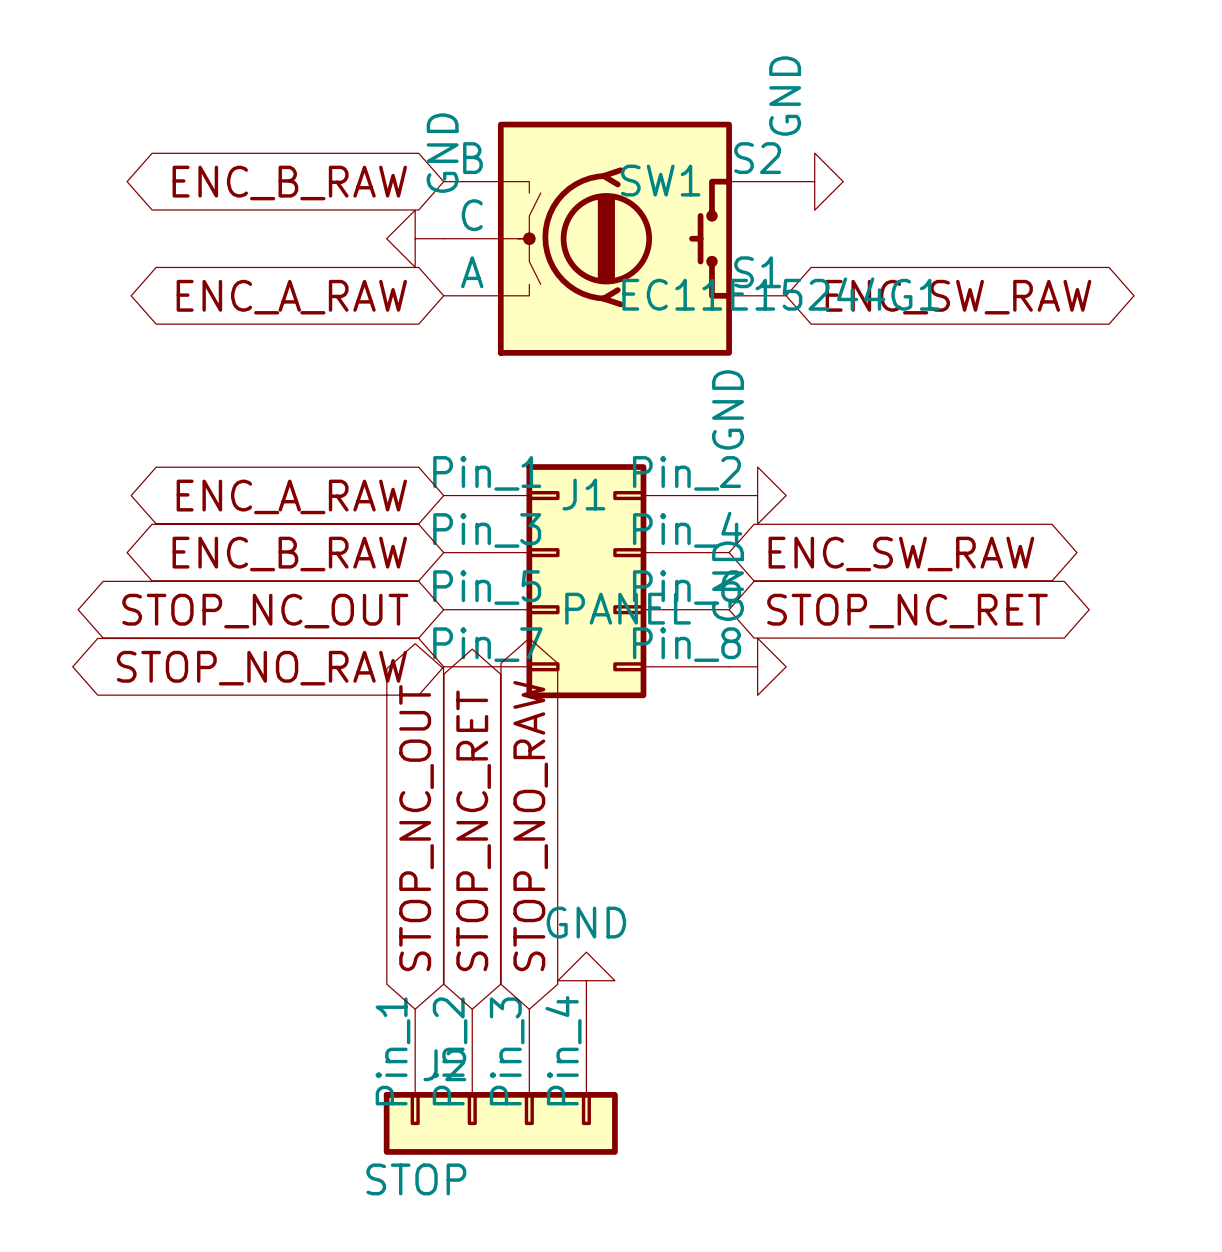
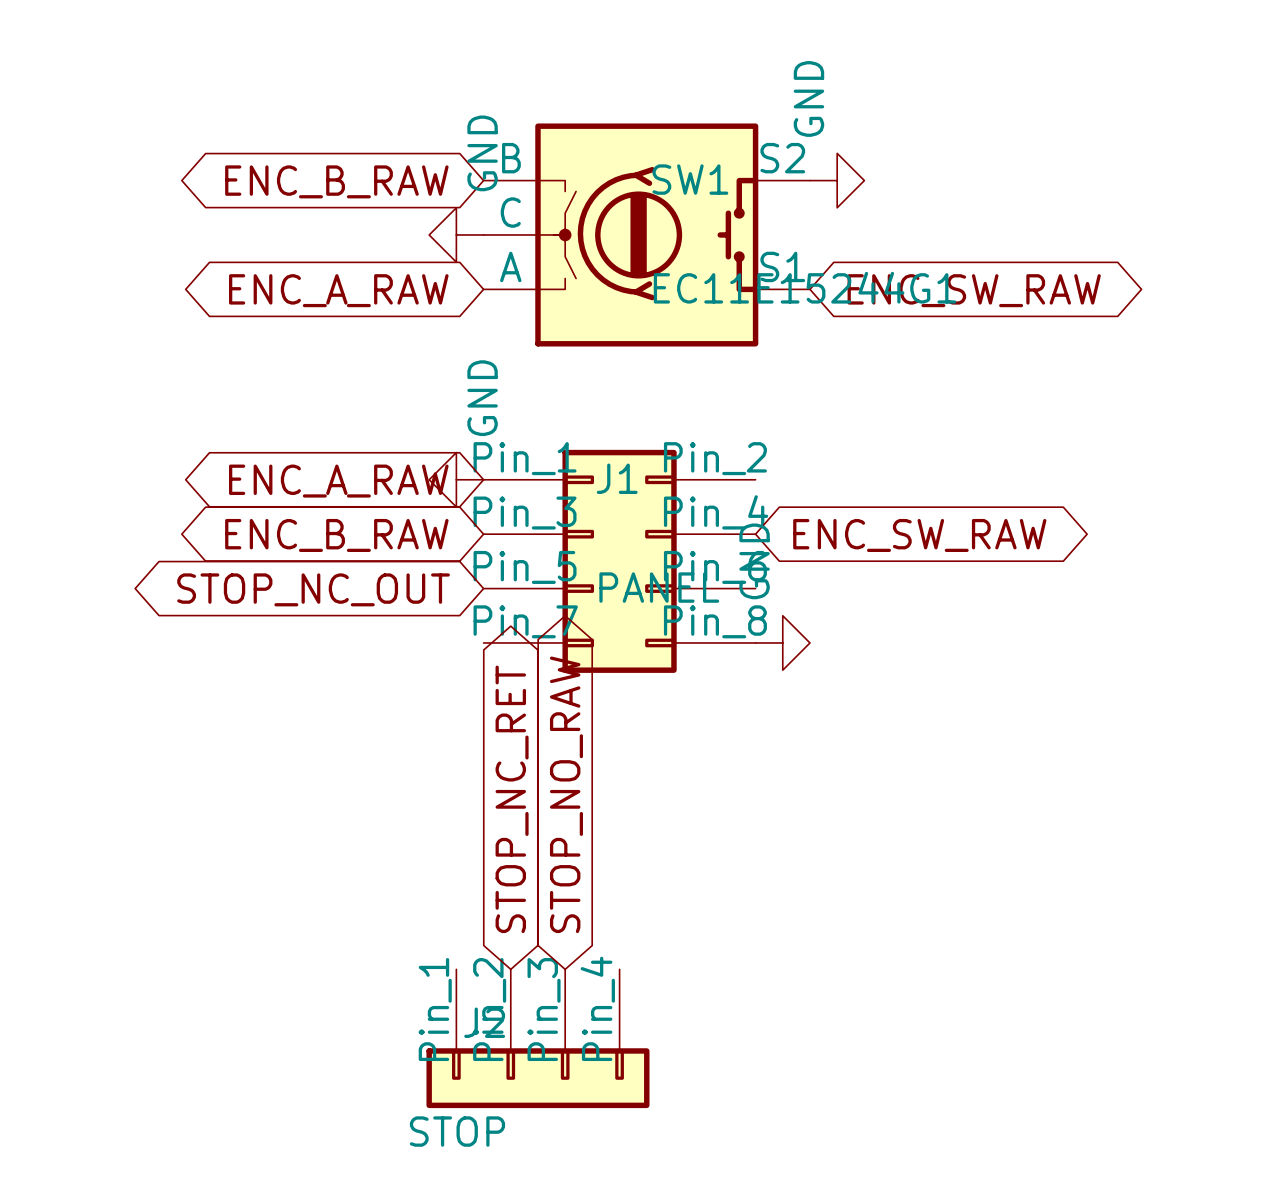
power symbol: none -> GND (456, 479)
power symbol: GND (757, 495) -> none
global label: STOP_NC_RET (907, 611) -> none
global label: STOP_NO_RAW (261, 668) -> none
global label: STOP_NC_OUT (416, 828) -> none
power symbol: GND (586, 980) -> none

